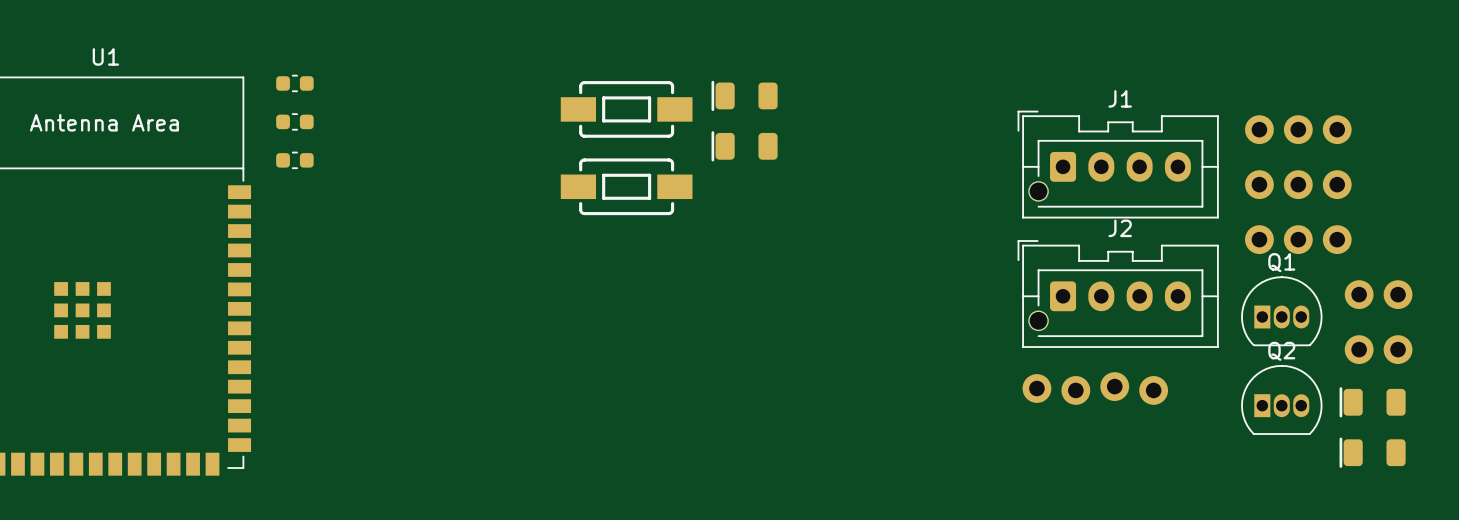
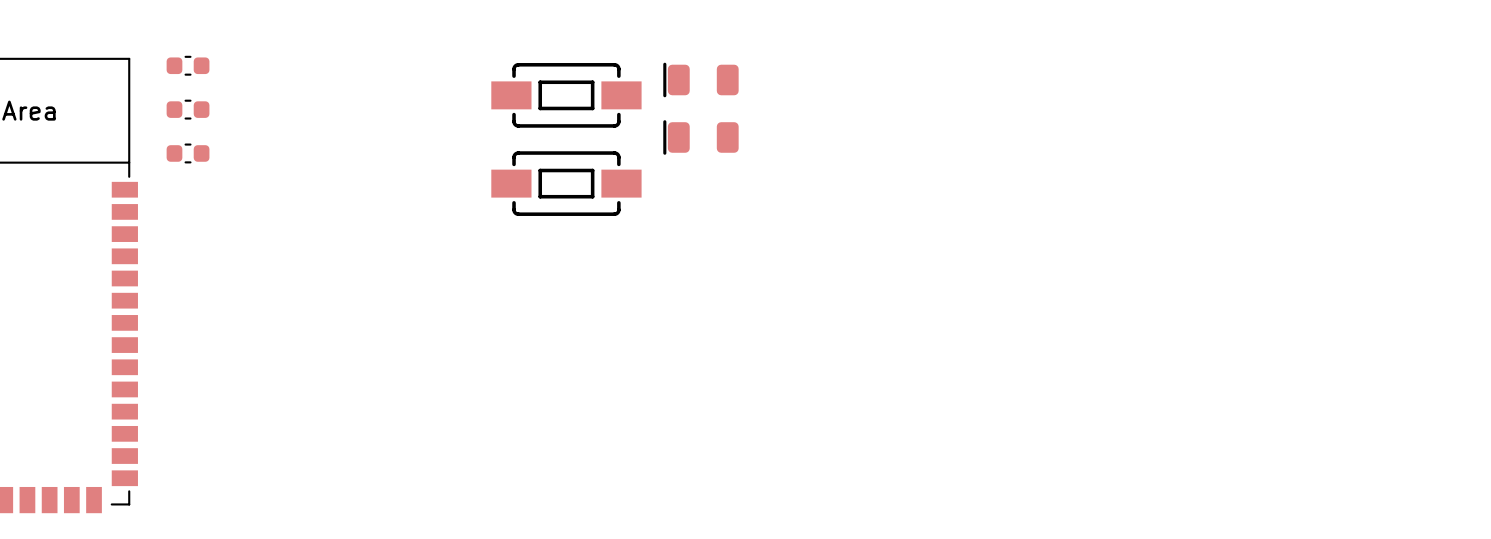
part: (1298, 129) -> none
J1: (1118, 164) -> none
part: (1298, 184) -> none
part: (1298, 239) -> none
J2: (1118, 294) -> none
part: (1378, 294) -> none
Q1: (1281, 311) -> none
part: (1378, 349) -> none
part: (1095, 388) -> none
Q2: (1281, 399) -> none
part: (1372, 402) -> none
part: (1372, 452) -> none

